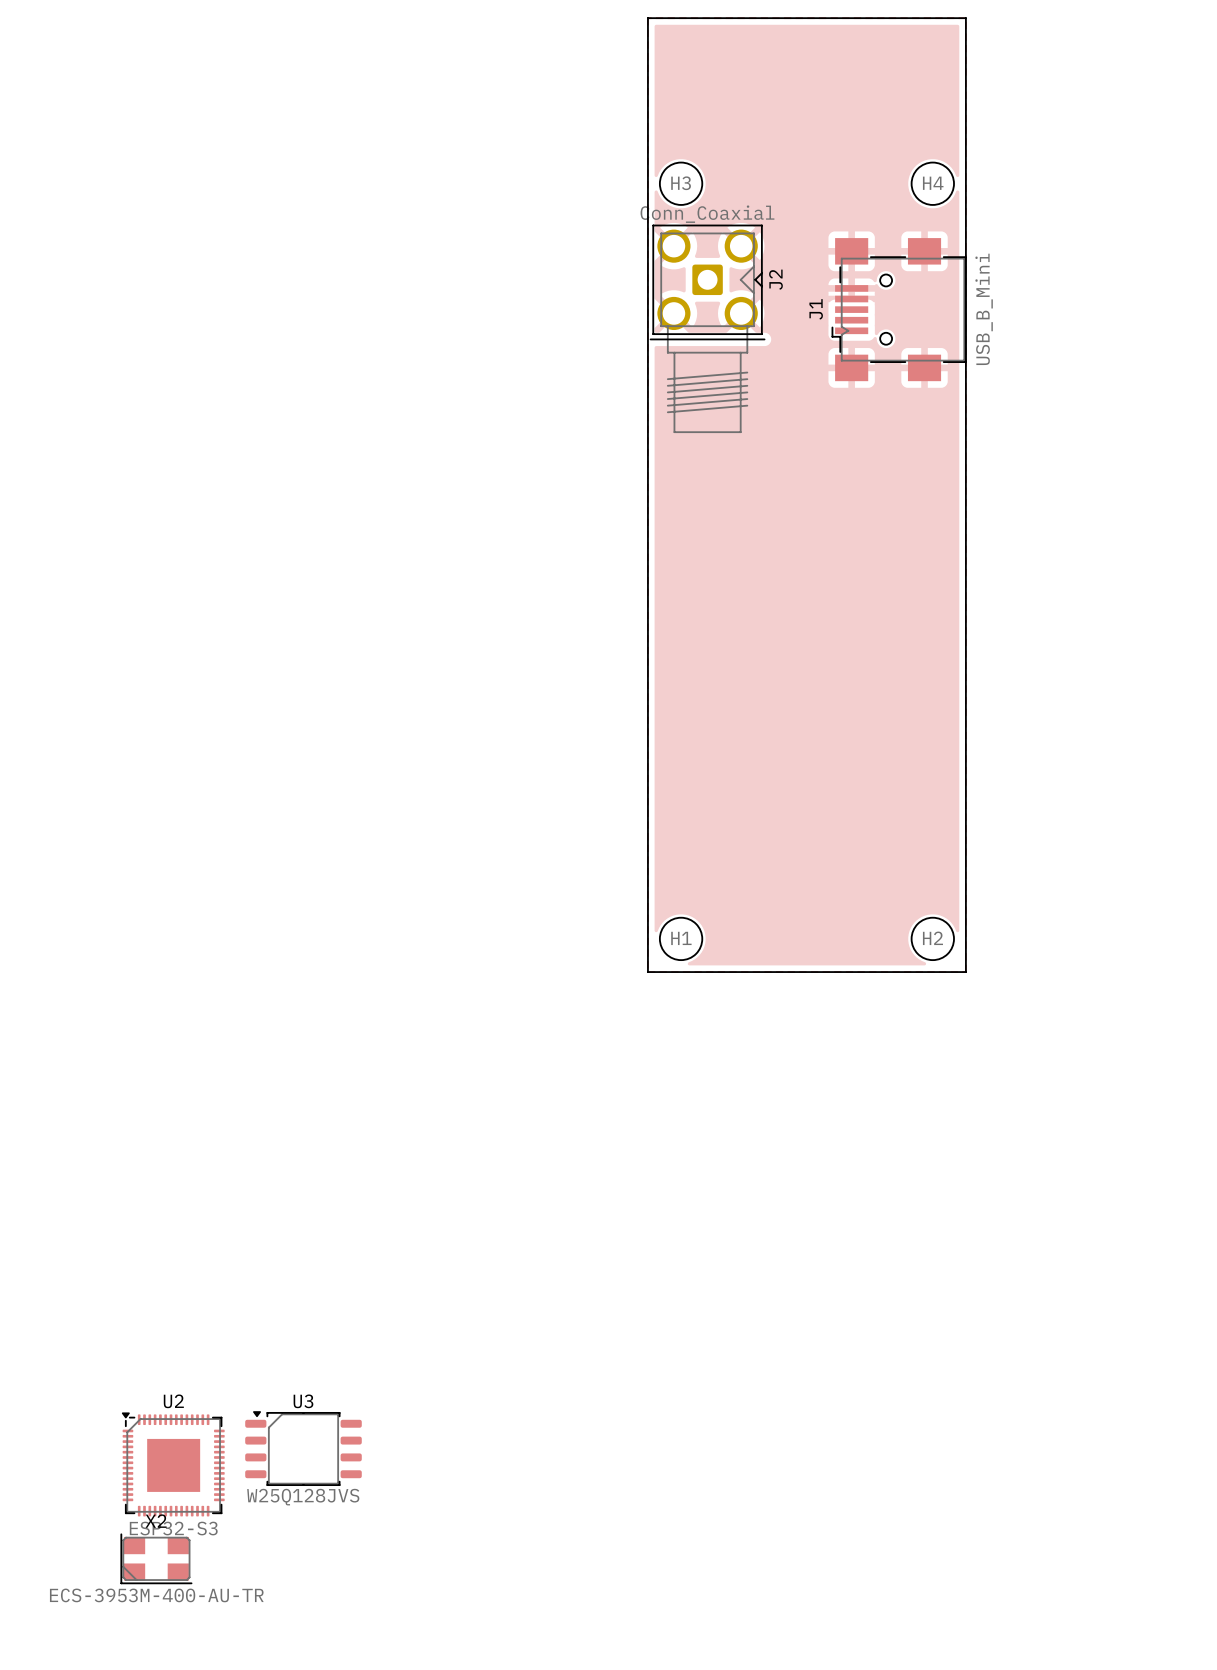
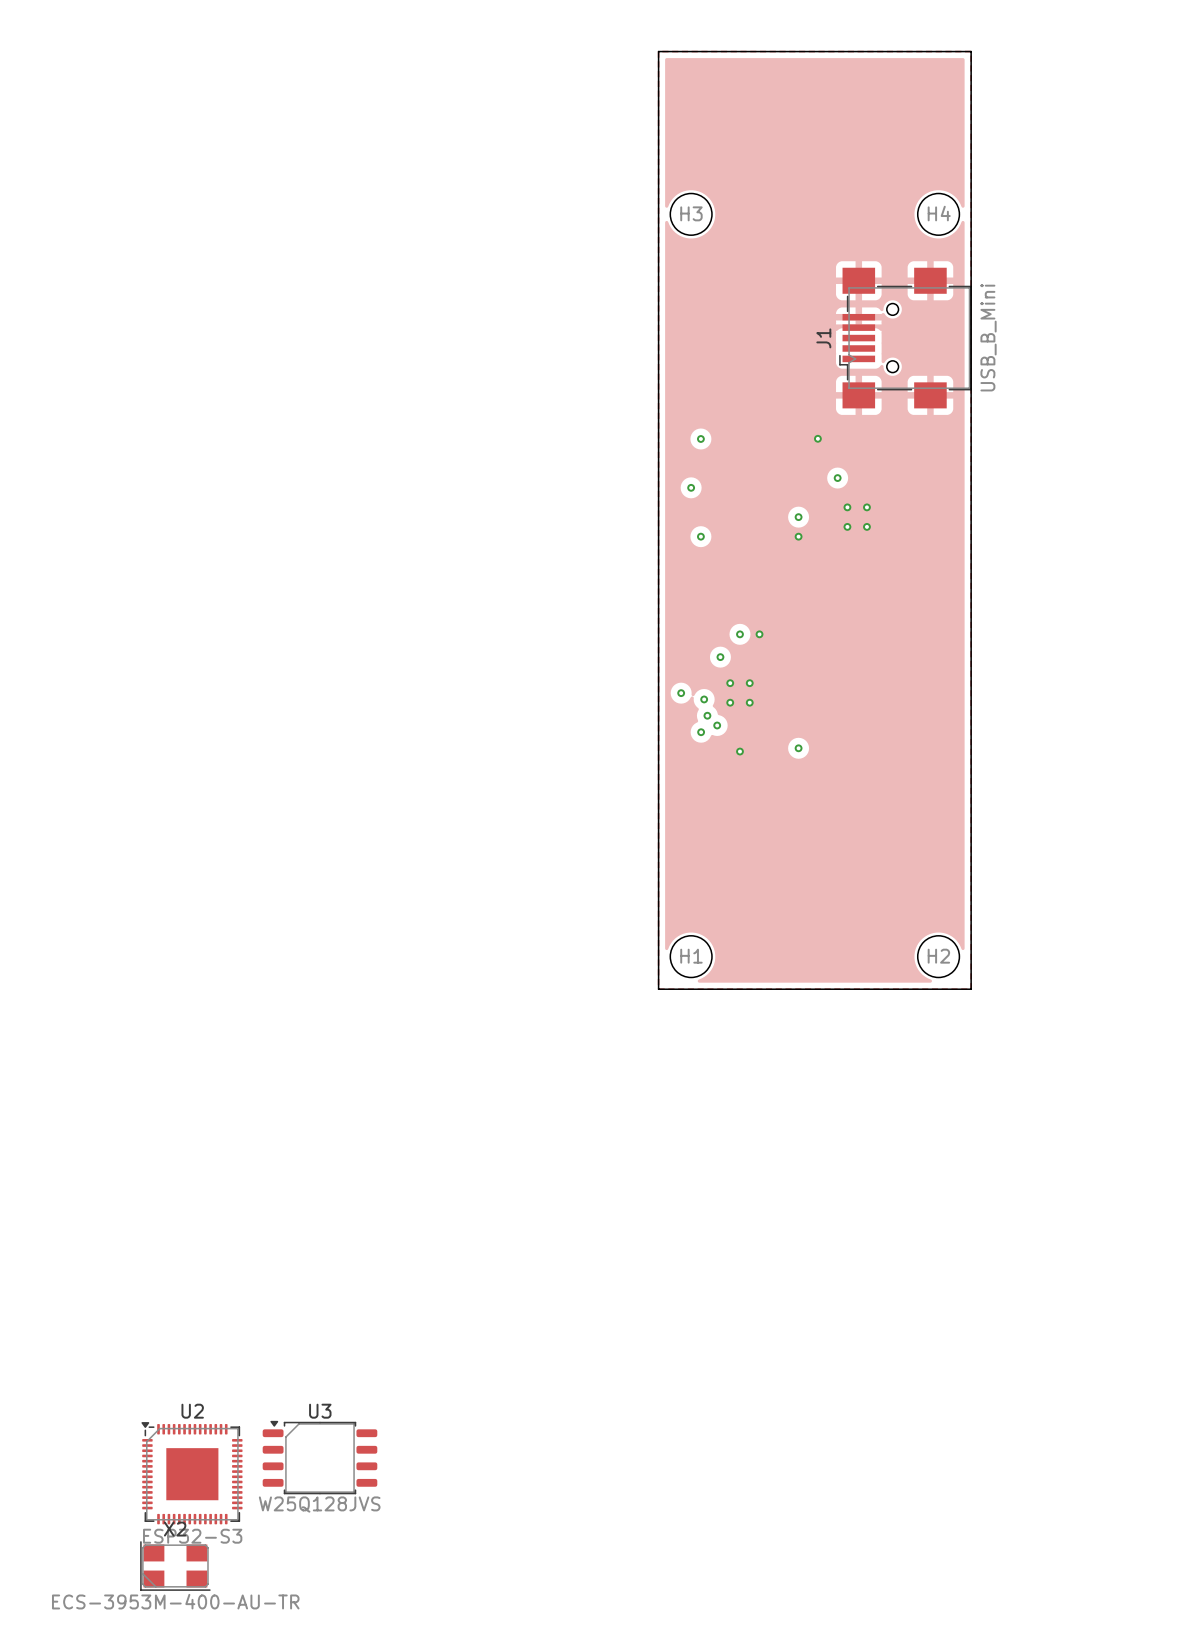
J2: Conn_Coaxial (707, 328) -> none
via: none -> (700, 438)
via: none -> (817, 438)
via: none -> (837, 478)
via: none -> (691, 487)
via: none -> (847, 507)
via: none -> (866, 507)
via: none -> (798, 517)
via: none -> (847, 526)
via: none -> (866, 526)
via: none -> (700, 536)
via: none -> (798, 536)
via: none -> (739, 634)
via: none -> (759, 634)
via: none -> (720, 657)
via: none -> (730, 683)
via: none -> (749, 683)
via: none -> (681, 693)
via: none -> (704, 699)
via: none -> (730, 702)
via: none -> (749, 702)
via: none -> (707, 715)
via: none -> (717, 725)
via: none -> (701, 732)
via: none -> (798, 748)
via: none -> (739, 751)

